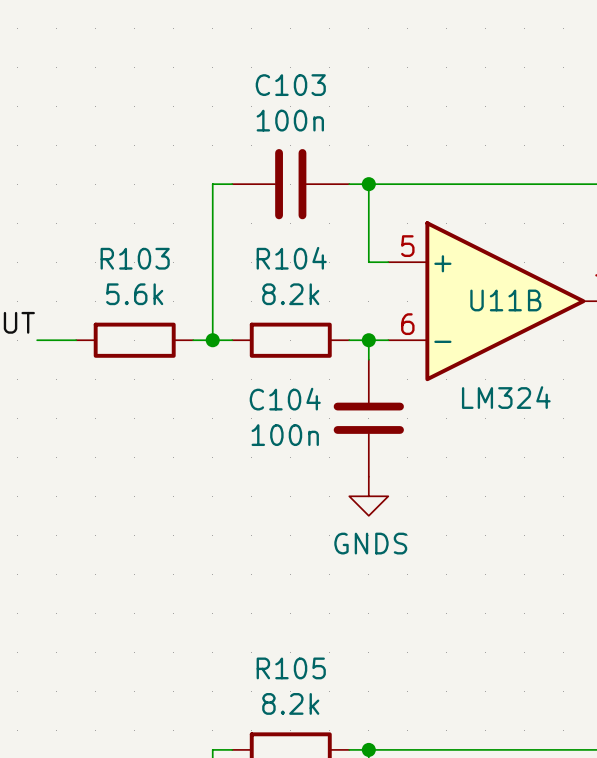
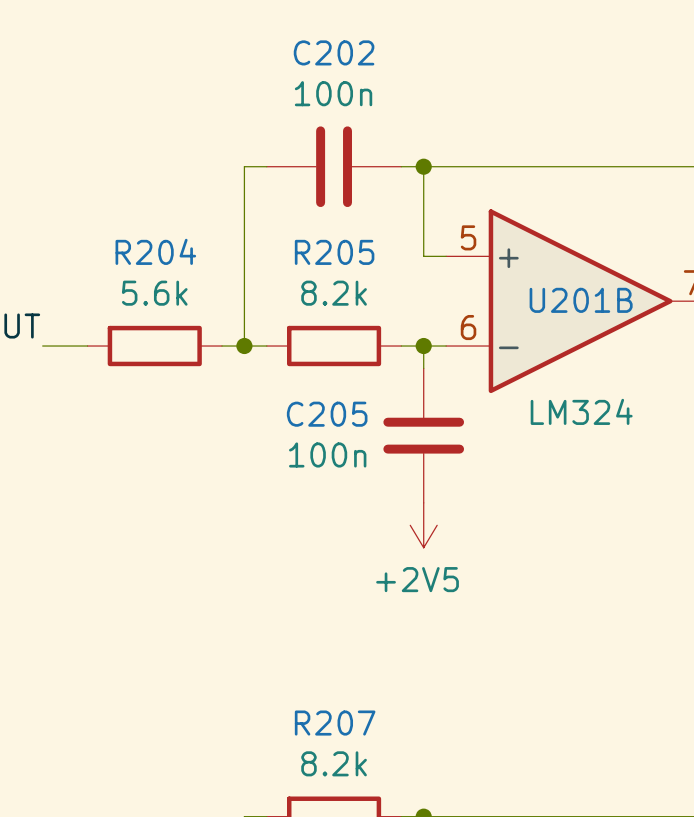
C103 name: C103 (290, 85) -> C202 (334, 52)
R103 name: R103 (135, 258) -> R204 (155, 251)
R104 name: R104 (291, 258) -> R205 (334, 252)
U11B name: U11B (505, 300) -> U201B (581, 300)
C104 name: C104 (285, 399) -> C205 (327, 414)
power symbol: GNDS (368, 496) -> +2V5 (423, 525)
R105 name: R105 (291, 668) -> R207 (335, 723)

